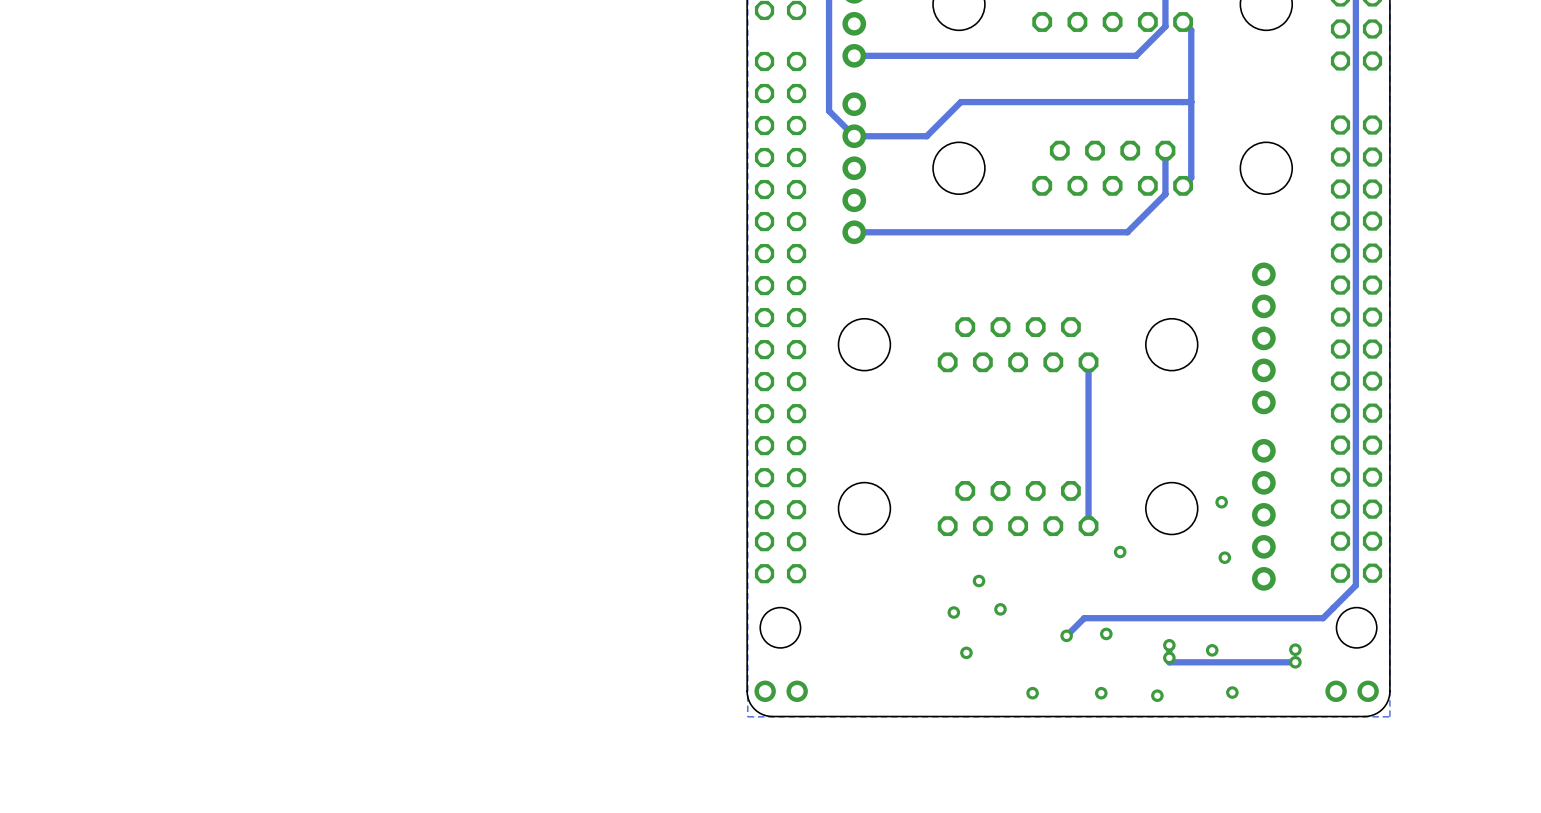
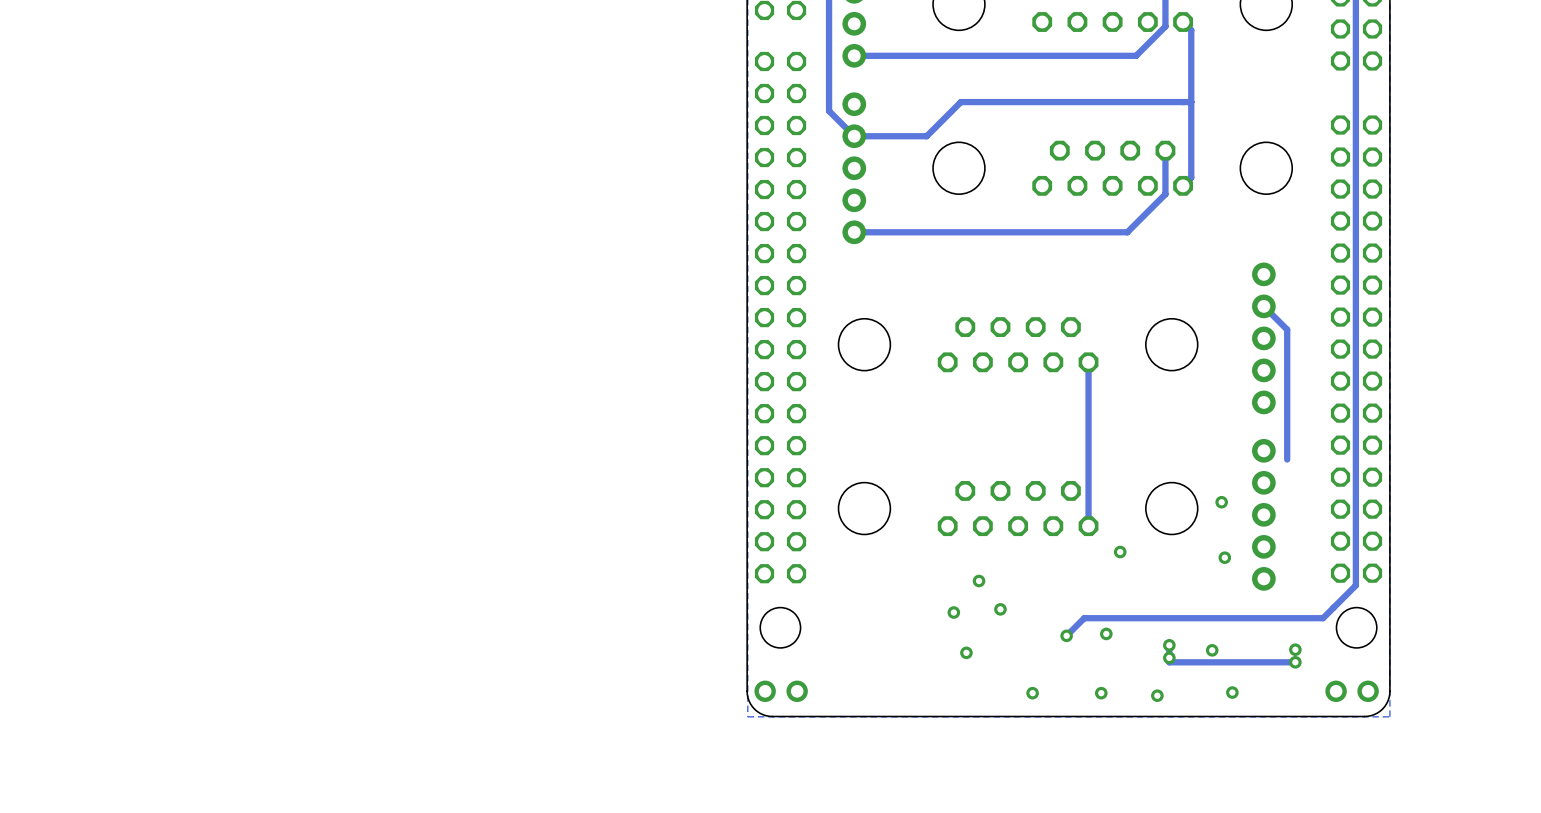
track: none -> (1263, 306) (1287, 329) (1287, 459)

